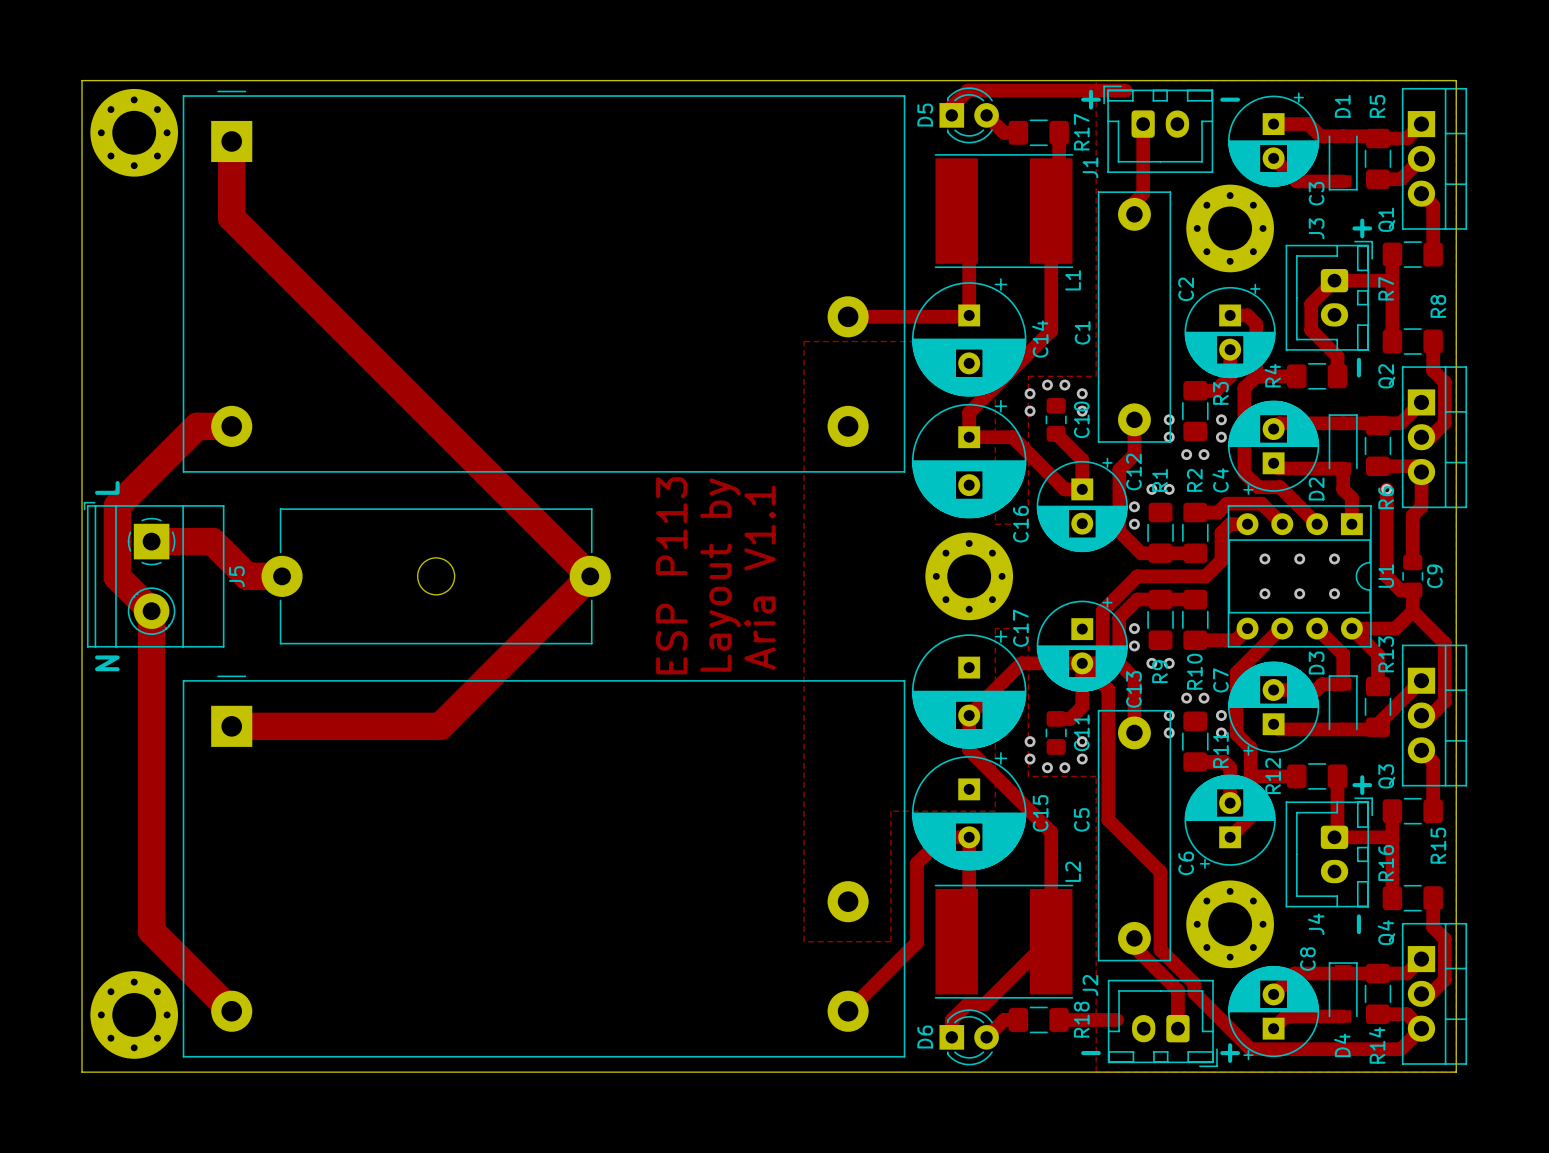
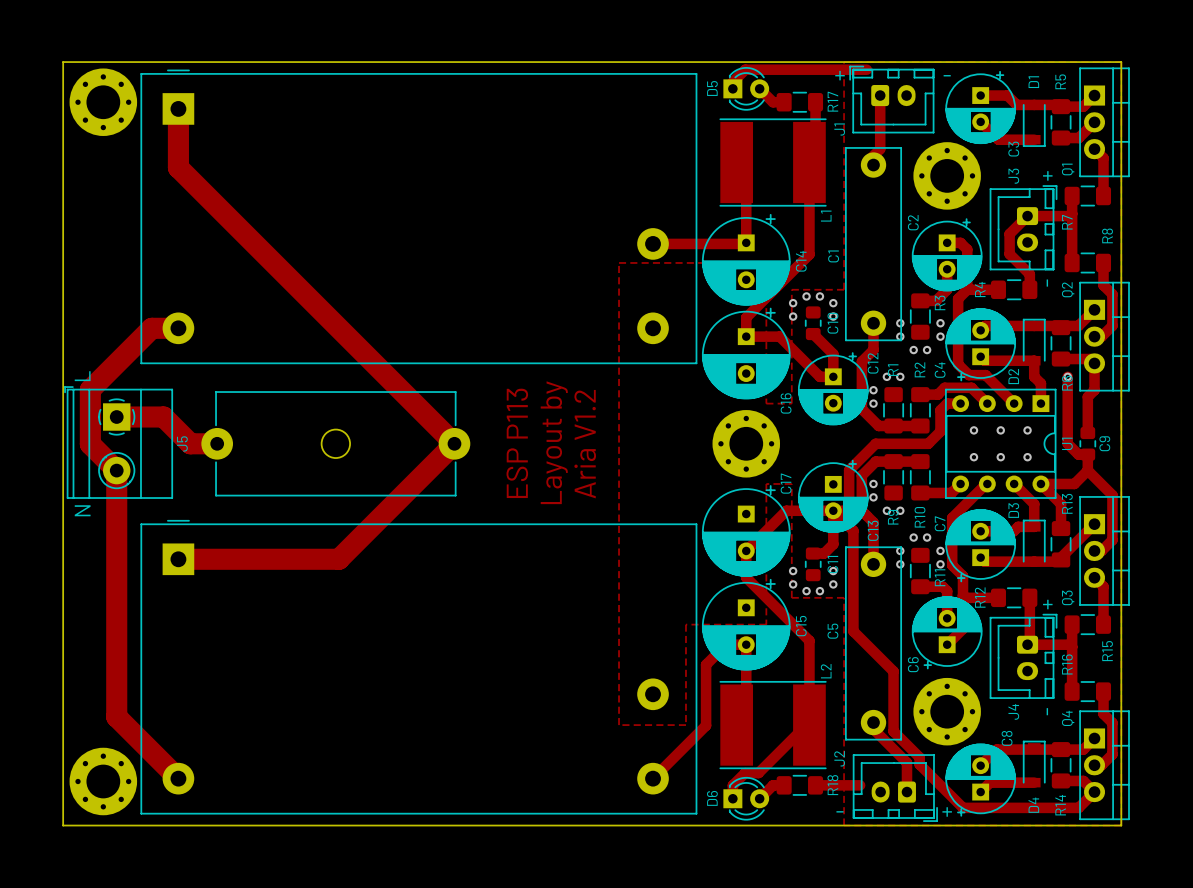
text: Aria V1.1 (760, 577) -> Aria V1.2 (585, 444)

